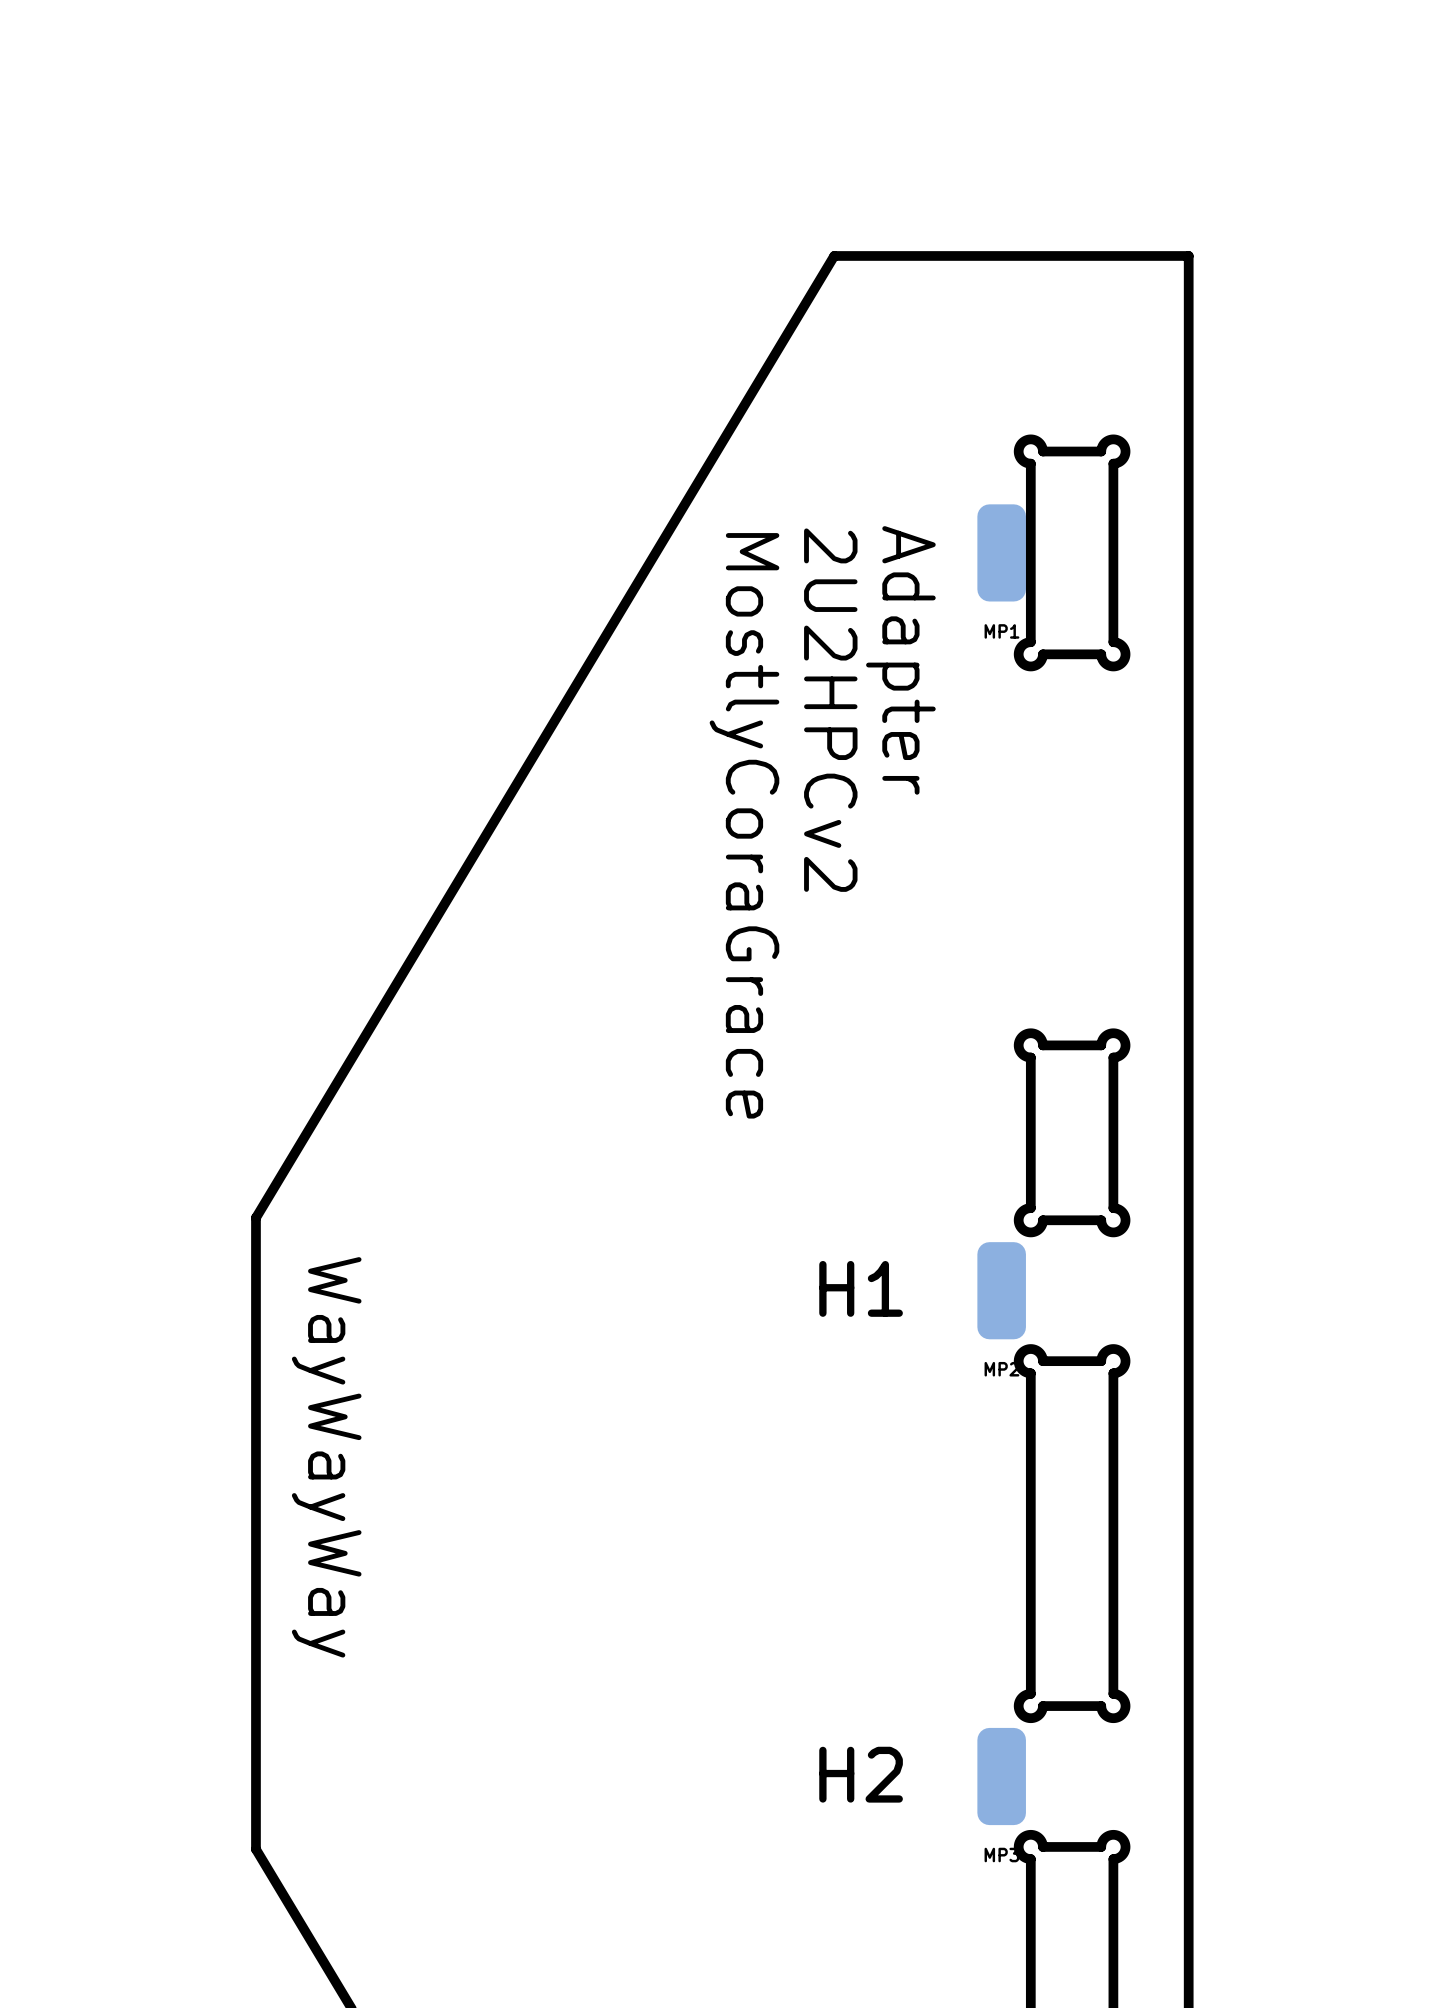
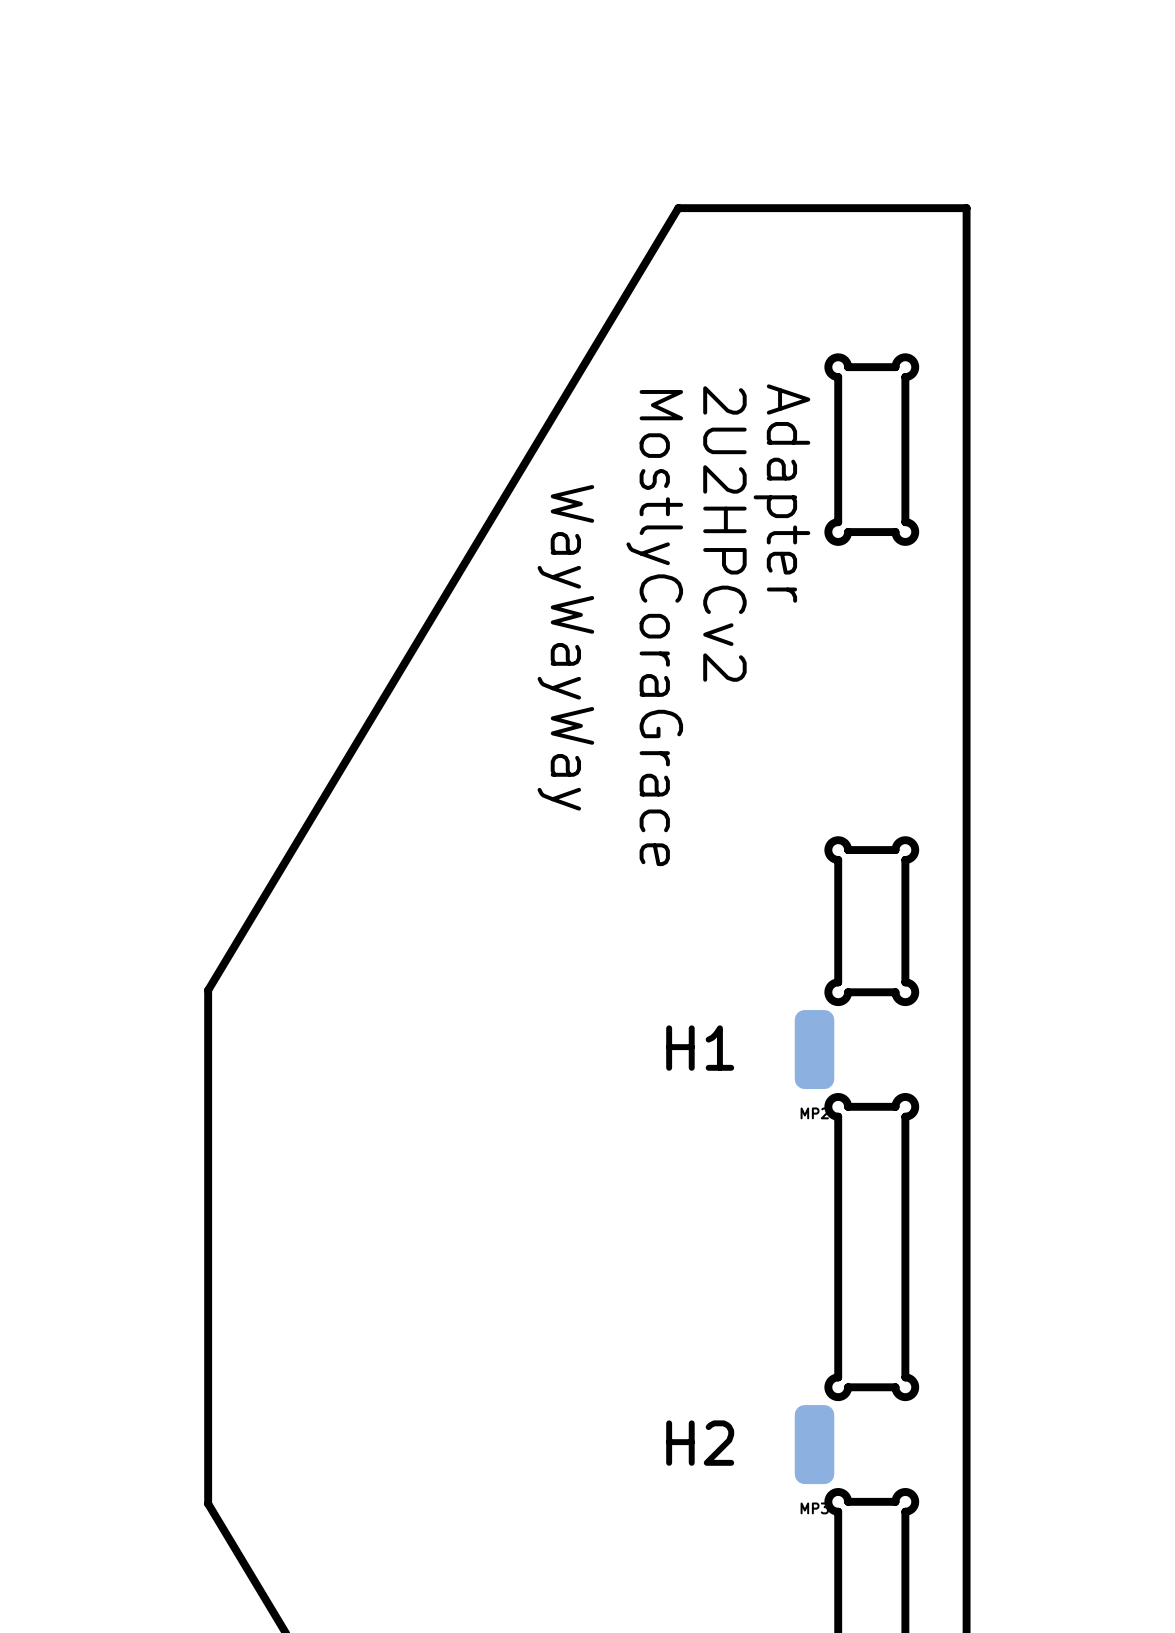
MP1: (1001, 552) -> none
text position: Adapter (900, 660) -> Adapter (781, 493)
text position: 2U2HPCv2 (830, 710) -> 2U2HPCv2 (724, 534)
text position: MostlyCoraGrace (744, 825) -> MostlyCoraGrace (654, 628)
text position: WayWayWay (326, 1457) -> WayWayWay (565, 647)

